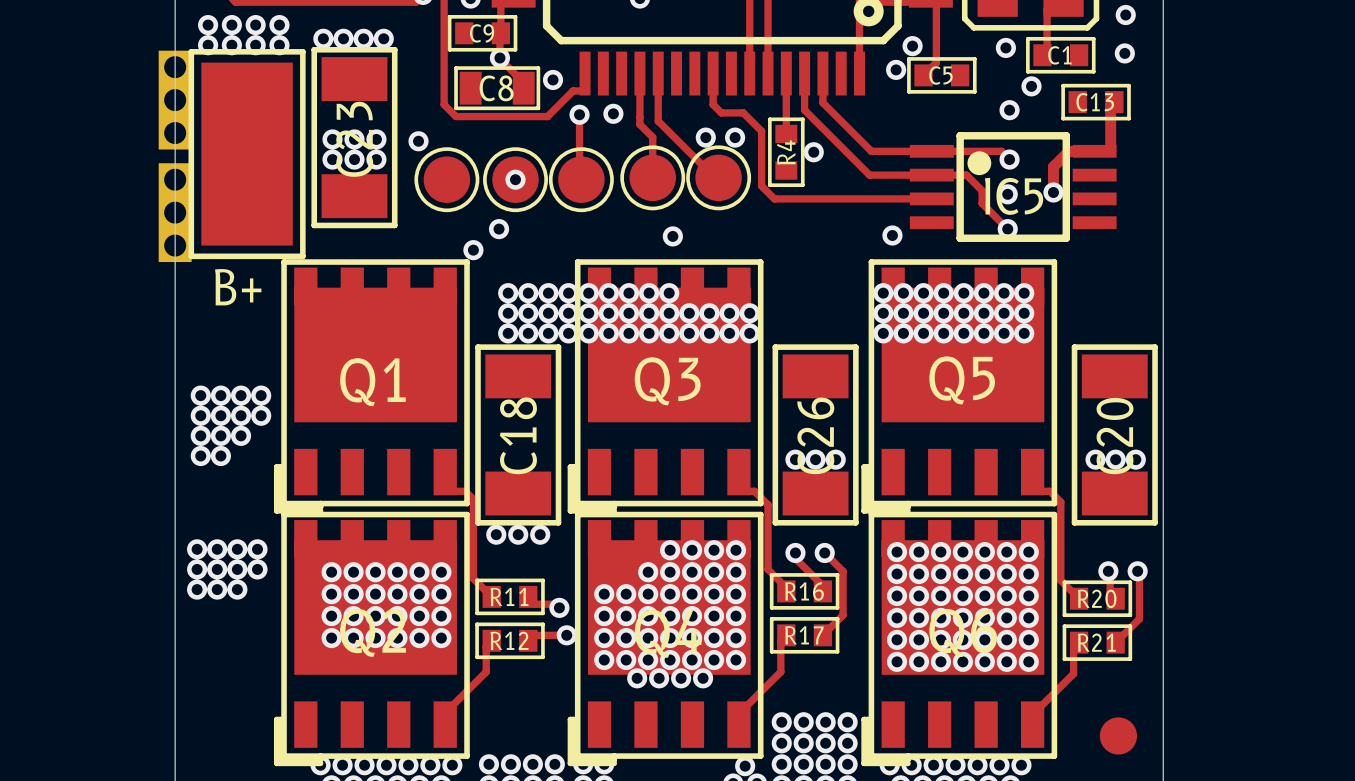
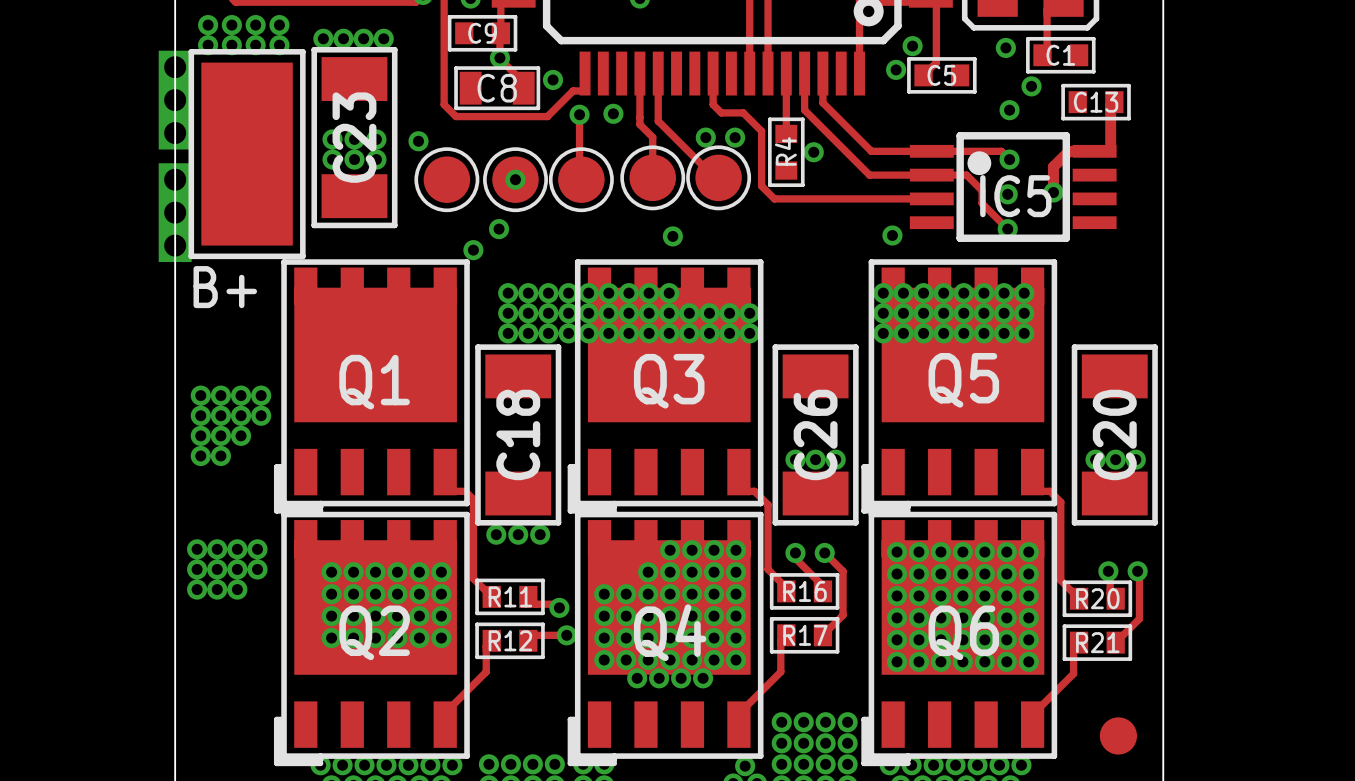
via: (1125, 15) -> none
via: (1124, 53) -> none

